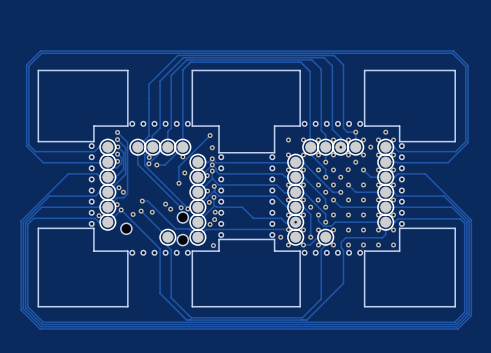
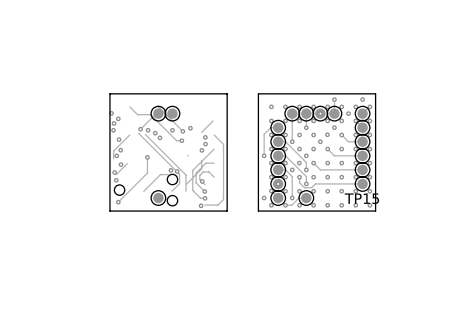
part: (132, 123) -> none
part: (143, 123) -> none
part: (154, 123) -> none
part: (165, 123) -> none
part: (176, 123) -> none
part: (187, 123) -> none
part: (304, 123) -> none
part: (315, 123) -> none
part: (326, 123) -> none
part: (337, 123) -> none
part: (349, 123) -> none
part: (360, 123) -> none
board edge: none -> (109, 93) (109, 211)
board edge: (127, 126) (127, 70) (38, 70) (38, 141) (93, 141) (93, 126) (116, 126) -> (120, 93) (181, 93)
board edge: (218, 126) (218, 152) (274, 152) -> (206, 93) (227, 93) (227, 211) (206, 211)
board edge: (300, 126) (300, 70) (192, 70) (192, 126) -> none
board edge: (364, 126) (364, 70) (455, 70) (455, 141) (399, 141) -> (342, 93) (282, 93)
track: (117, 132) (127, 142) (127, 193) (123, 197) (117, 197) (107, 207) (41, 207) (25, 223) (25, 307) (42, 324) (455, 324) (466, 313) (466, 222) (451, 207) (385, 207) -> none
via: (117, 132) -> none
track: (355, 132) (347, 132) (343, 128) (343, 64) (334, 55) (177, 55) (148, 84) (148, 136) (136, 148) -> none
track: (210, 135) (178, 166) (178, 183) -> none
via: (210, 135) -> none
track: (117, 139) (125, 147) (125, 174) (107, 192) (99, 192) (95, 196) (49, 196) (23, 222) (23, 308) (41, 326) (456, 326) (469, 314) (469, 221) (444, 196) (397, 196) (393, 192) (385, 192) -> none
via: (117, 139) -> none
track: none -> (129, 106) (137, 114) (150, 114) (176, 140) (181, 140)
board edge: none -> (375, 108) (375, 189)
part: (91, 146) -> none
track: (117, 146) (123, 152) (123, 169) (115, 177) (100, 177) (97, 173) (68, 173) (21, 221) (21, 310) (40, 328) (458, 328) (471, 315) (471, 220) (425, 173) (397, 173) (394, 177) (385, 177) -> none
part: (401, 146) -> none
part: (107, 147) -> none
track: (137, 147) (137, 164) (181, 207) -> none
part: (137, 147) -> none
track: (152, 147) (144, 155) (144, 165) (187, 208) -> none
track: (152, 147) (152, 136) (160, 128) (160, 81) (183, 57) (324, 57) (332, 66) (332, 129) (340, 137) (340, 147) -> none
part: (152, 147) -> none
via: (212, 147) -> none
track: (310, 147) (310, 71) (300, 62) (190, 62) (182, 69) (182, 147) (165, 164) (156, 164) -> none
track: (325, 147) (325, 134) (321, 130) (321, 69) (311, 59) (186, 59) (171, 75) (171, 128) (167, 131) (167, 147) -> none
track: (385, 147) (394, 147) (398, 151) (455, 151) (465, 141) (465, 66) (452, 53) (41, 53) (28, 66) (28, 144) (35, 151) (94, 151) (98, 147) (107, 147) (107, 151) (117, 161) -> none
via: none -> (118, 118)
track: (117, 154) (121, 158) (121, 163) (117, 167) (113, 167) (107, 162) -> none
via: (117, 154) -> none
track: none -> (213, 120) (201, 132)
track: (310, 154) (325, 169) (325, 177) -> (292, 120) (292, 141)
via: (182, 156) -> none
part: (91, 157) -> none
via: none -> (114, 123)
via: (149, 157) -> none
part: (221, 157) -> none
part: (272, 157) -> none
part: (401, 157) -> none
via: (212, 158) -> none
via: (117, 161) -> none
part: (107, 162) -> none
track: (197, 162) (208, 162) (212, 158) (216, 162) (303, 162) (333, 192) (340, 192) -> none
part: (197, 162) -> none
via: none -> (190, 128)
track: none -> (278, 127) (270, 127) (264, 134) (264, 155)
track: (385, 162) (447, 162) (468, 142) (468, 65) (453, 51) (40, 51) (26, 64) (26, 146) (43, 162) (107, 162) -> none
via: none -> (113, 130)
via: none -> (172, 130)
via: (212, 164) -> none
via: none -> (182, 131)
part: (91, 168) -> none
track: none -> (139, 133) (179, 174) (179, 183) (171, 191)
via: none -> (155, 133)
part: (221, 168) -> none
part: (272, 168) -> none
part: (401, 168) -> none
track: none -> (129, 135) (113, 151) (113, 158)
track: none -> (145, 134) (186, 175) (186, 191)
track: none -> (214, 135) (223, 144) (223, 199) (218, 205) (205, 205)
track: (212, 171) (212, 178) -> none
via: (212, 171) -> none
via: (184, 172) -> none
via: none -> (205, 137)
via: none -> (159, 137)
via: none -> (119, 139)
via: (207, 175) -> none
via: none -> (181, 140)
track: (200, 176) (212, 164) (218, 173) (282, 173) (285, 177) (295, 177) -> none
part: (107, 177) -> none
part: (197, 177) -> none
via position: (325, 177) -> (292, 141)
track: (212, 178) (197, 193) -> none
track: (212, 178) (218, 184) (276, 184) (284, 192) (295, 192) -> none
part: (91, 179) -> none
via: none -> (205, 144)
part: (221, 179) -> none
part: (272, 179) -> none
part: (401, 179) -> none
via: (178, 183) -> none
track: none -> (214, 149) (192, 170) (192, 190) (200, 198) (205, 198)
via: none -> (120, 150)
track: (214, 186) (215, 190) (197, 207) -> none
via: (118, 187) -> none
part: (91, 190) -> none
via: (207, 190) -> none
track: (214, 190) (218, 196) (275, 196) (286, 207) (295, 207) -> none
part: (221, 190) -> none
part: (272, 190) -> none
part: (401, 190) -> none
part: (107, 192) -> none
part: (197, 192) -> none
via: none -> (264, 155)
via: (340, 192) -> none
track: none -> (147, 157) (147, 173) (118, 202)
via: none -> (147, 157)
via: (213, 197) -> none
track: none -> (214, 163) (206, 163) (196, 173) (196, 182) (204, 191)
track: none -> (127, 163) (116, 174)
part: (91, 201) -> none
via: none -> (120, 164)
track: (142, 201) (147, 201) (175, 228) (189, 228) (197, 237) -> none
via: (142, 201) -> none
part: (221, 201) -> none
part: (272, 201) -> none
part: (401, 201) -> none
via: (209, 202) -> none
via: (117, 204) -> none
via: (165, 204) -> none
track: (213, 206) (242, 207) (253, 218) (281, 218) (285, 222) (295, 222) -> none
part: (107, 207) -> none
part: (197, 207) -> none
via: (170, 209) -> none
track: (141, 211) (167, 237) -> (157, 106) (182, 131)
via: (141, 211) -> none
part: (91, 212) -> none
via: (152, 212) -> none
track: none -> (168, 174) (160, 174) (143, 191)
via: (215, 212) -> none
part: (221, 212) -> none
part: (272, 212) -> none
part: (401, 212) -> none
via: (133, 214) -> none
via: (99, 215) -> none
track: none -> (214, 177) (208, 171) (203, 171) (199, 175) (199, 179) (205, 184)
via: none -> (116, 180)
part: (107, 222) -> none
track: (108, 222) (121, 210) (160, 248) (160, 293) (186, 320) (306, 320) (343, 283) (343, 250) (341, 247) (341, 242) (345, 237) (382, 237) (385, 234) (385, 222) (394, 222) (397, 218) (460, 218) (464, 223) (464, 312) (454, 322) (43, 322) (27, 306) (27, 224) (33, 218) (95, 218) (98, 222) (107, 222) -> none
part: (197, 222) -> none
part: (91, 223) -> none
part: (221, 223) -> none
part: (272, 223) -> none
part: (401, 223) -> none
via: (210, 224) -> none
board edge: (399, 228) (455, 228) (455, 306) (364, 306) (364, 251) -> (282, 211) (342, 211)
track: (288, 229) (206, 229) (197, 237) -> none
via: none -> (204, 191)
part: (221, 235) -> none
part: (272, 235) -> none
part: (197, 237) -> none
via: none -> (205, 198)
track: (325, 237) (325, 245) (321, 249) (321, 298) (302, 317) (191, 317) (171, 297) (171, 250) (167, 246) (167, 237) -> none
TP15 name: none -> TP15 (361, 198)
board edge: (274, 239) (218, 239) (218, 251) -> (258, 200) (258, 118)
via: none -> (118, 202)
board edge: (127, 251) (127, 306) (38, 306) (38, 228) (93, 228) (93, 251) (116, 251) -> (120, 211) (181, 211)
board edge: (300, 251) (300, 306) (192, 306) (192, 251) -> none
part: (132, 252) -> none
part: (143, 252) -> none
part: (154, 252) -> none
part: (165, 252) -> none
part: (176, 252) -> none
part: (187, 252) -> none
part: (304, 252) -> none
part: (315, 252) -> none
part: (326, 252) -> none
part: (337, 252) -> none
part: (349, 252) -> none
part: (360, 252) -> none

